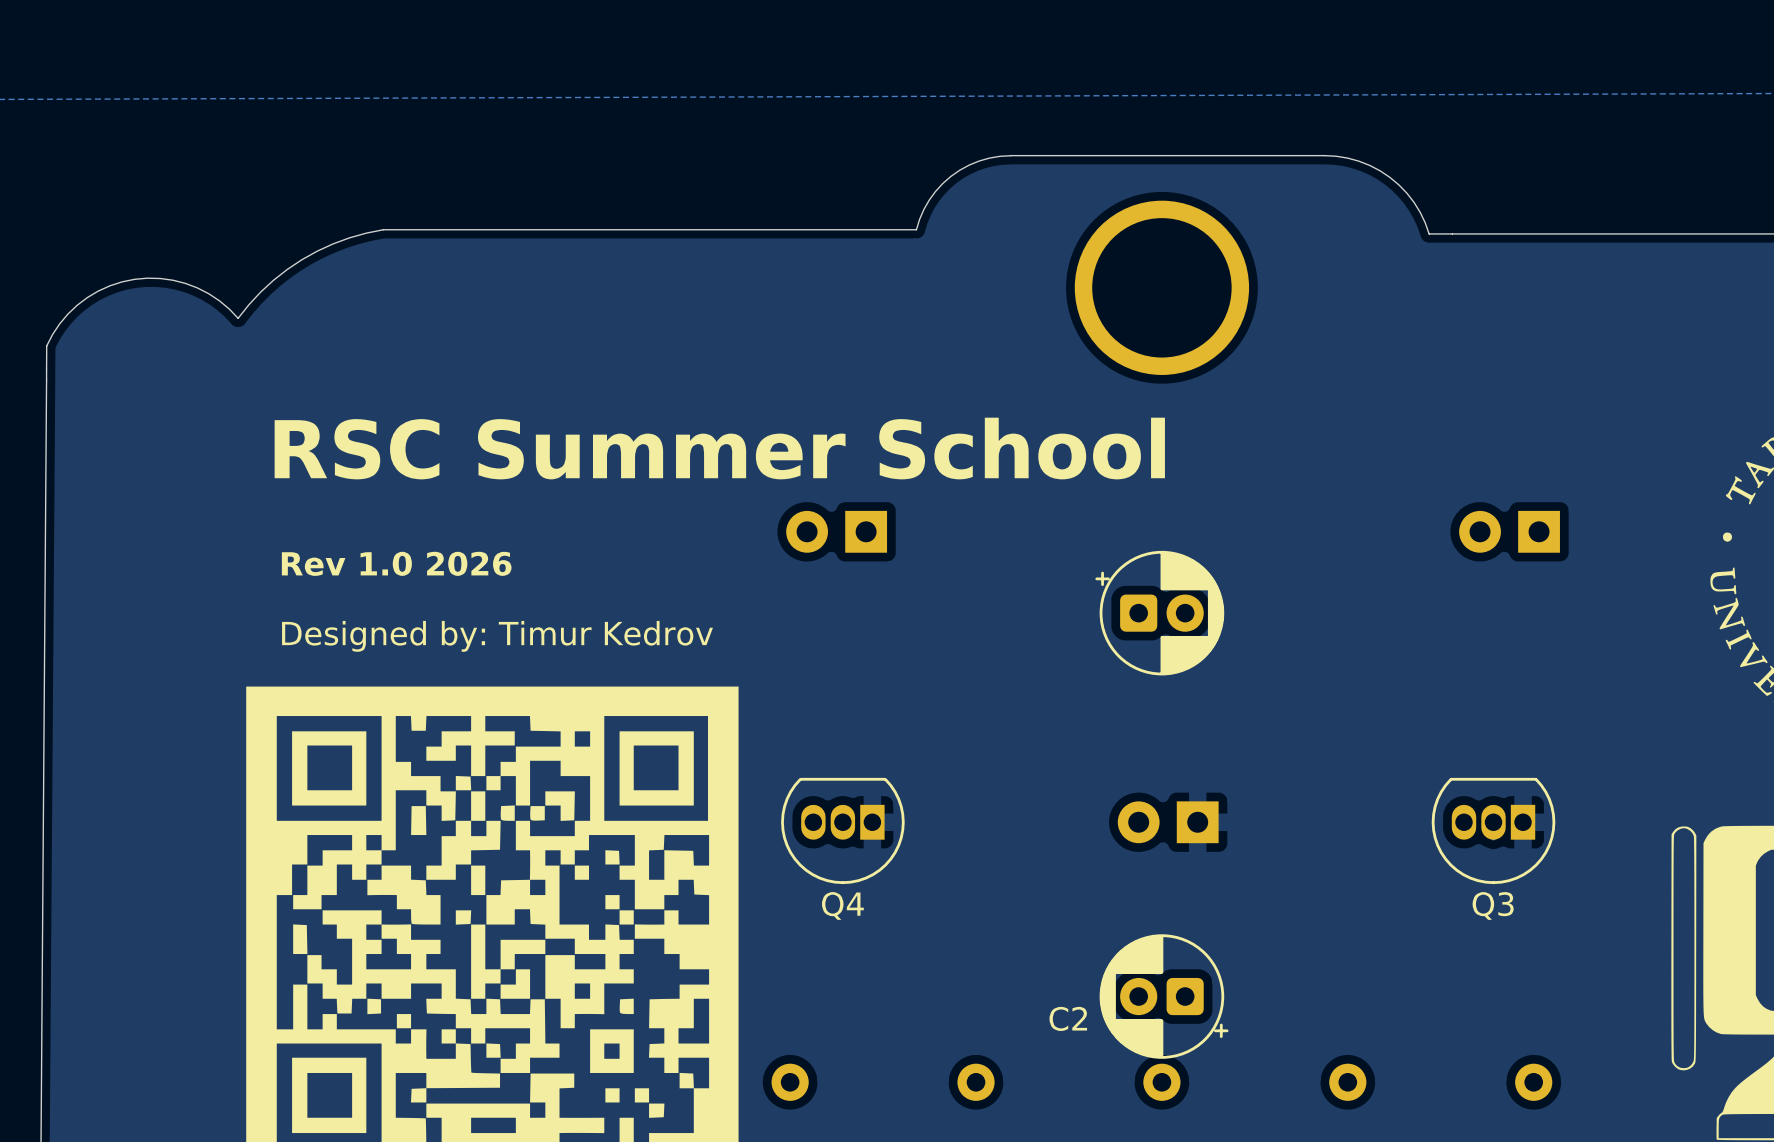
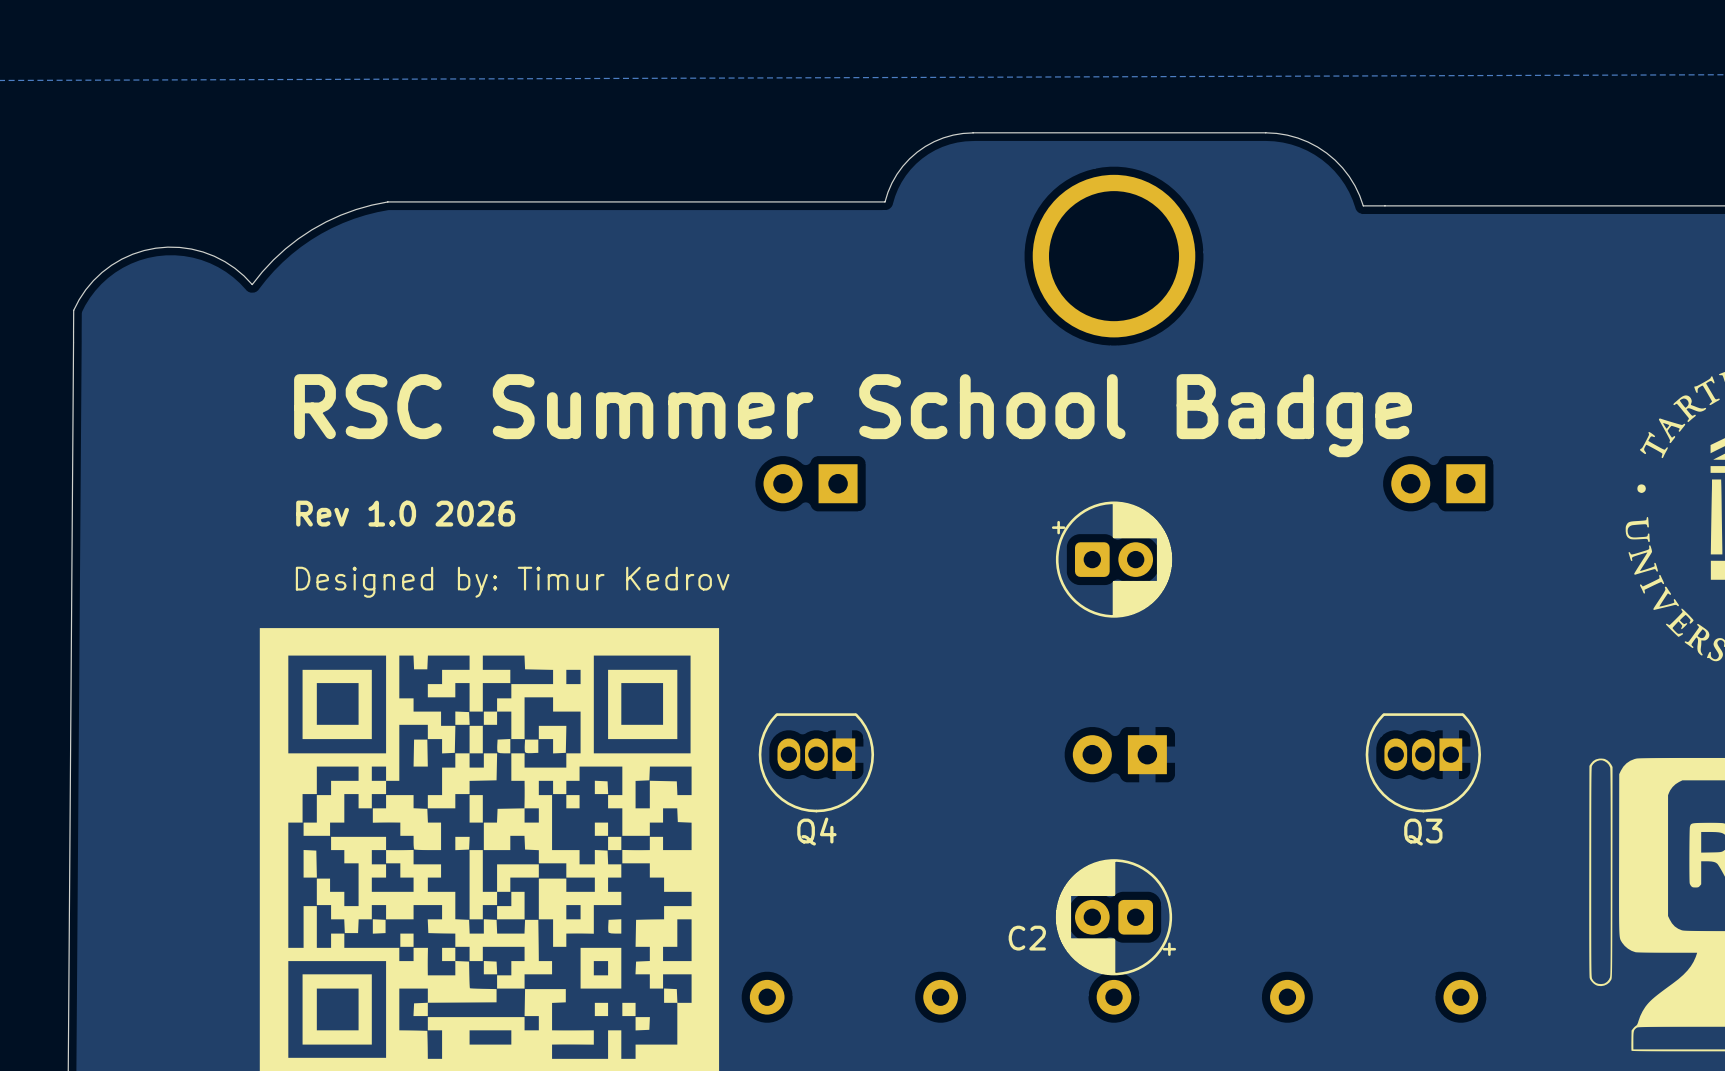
text: RSC Summer School (719, 448) -> RSC Summer School Badge (853, 415)

